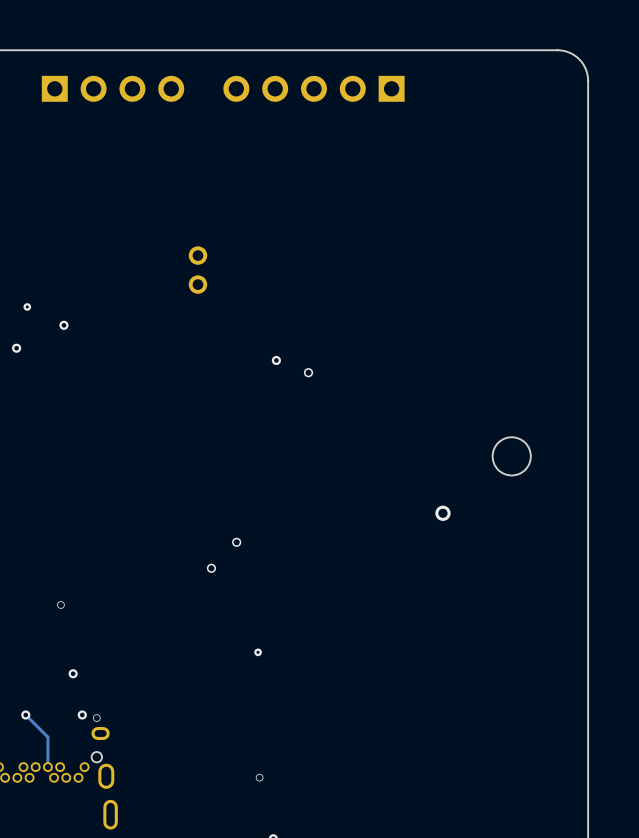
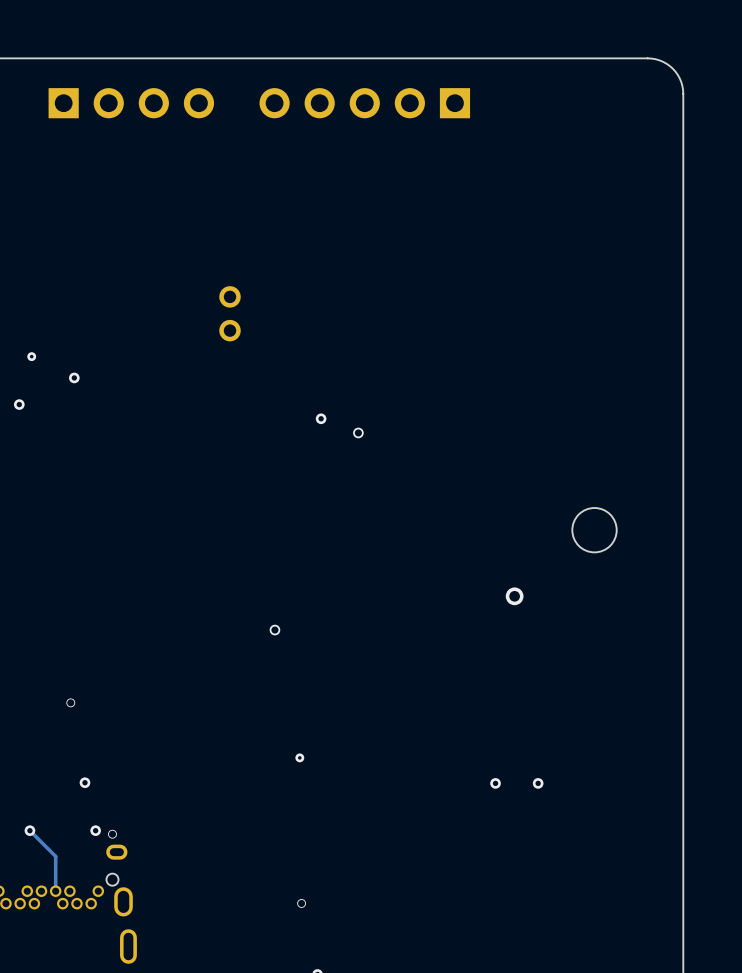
via: (211, 568) -> none
via: none -> (495, 783)
via: none -> (538, 783)

